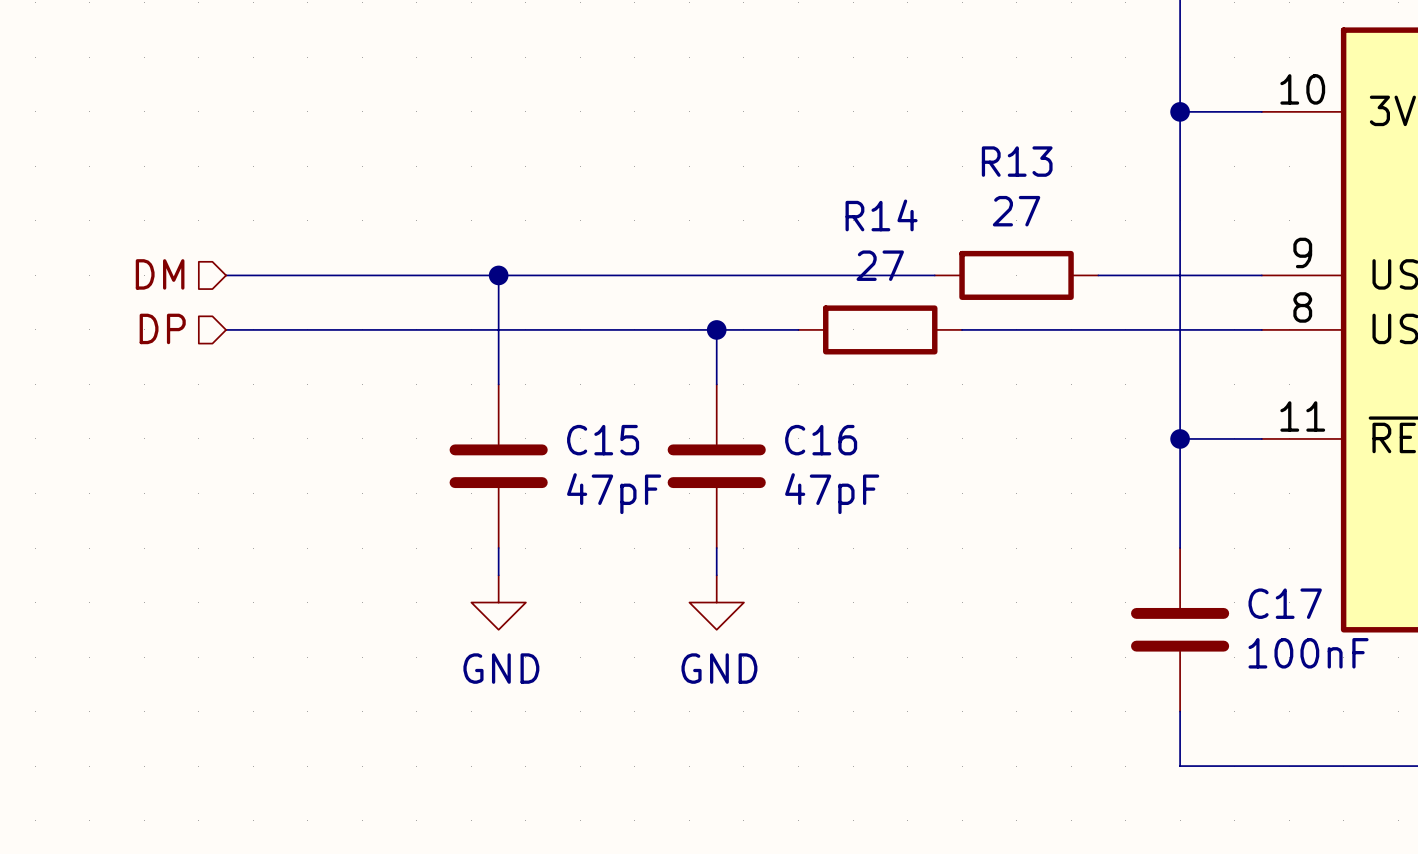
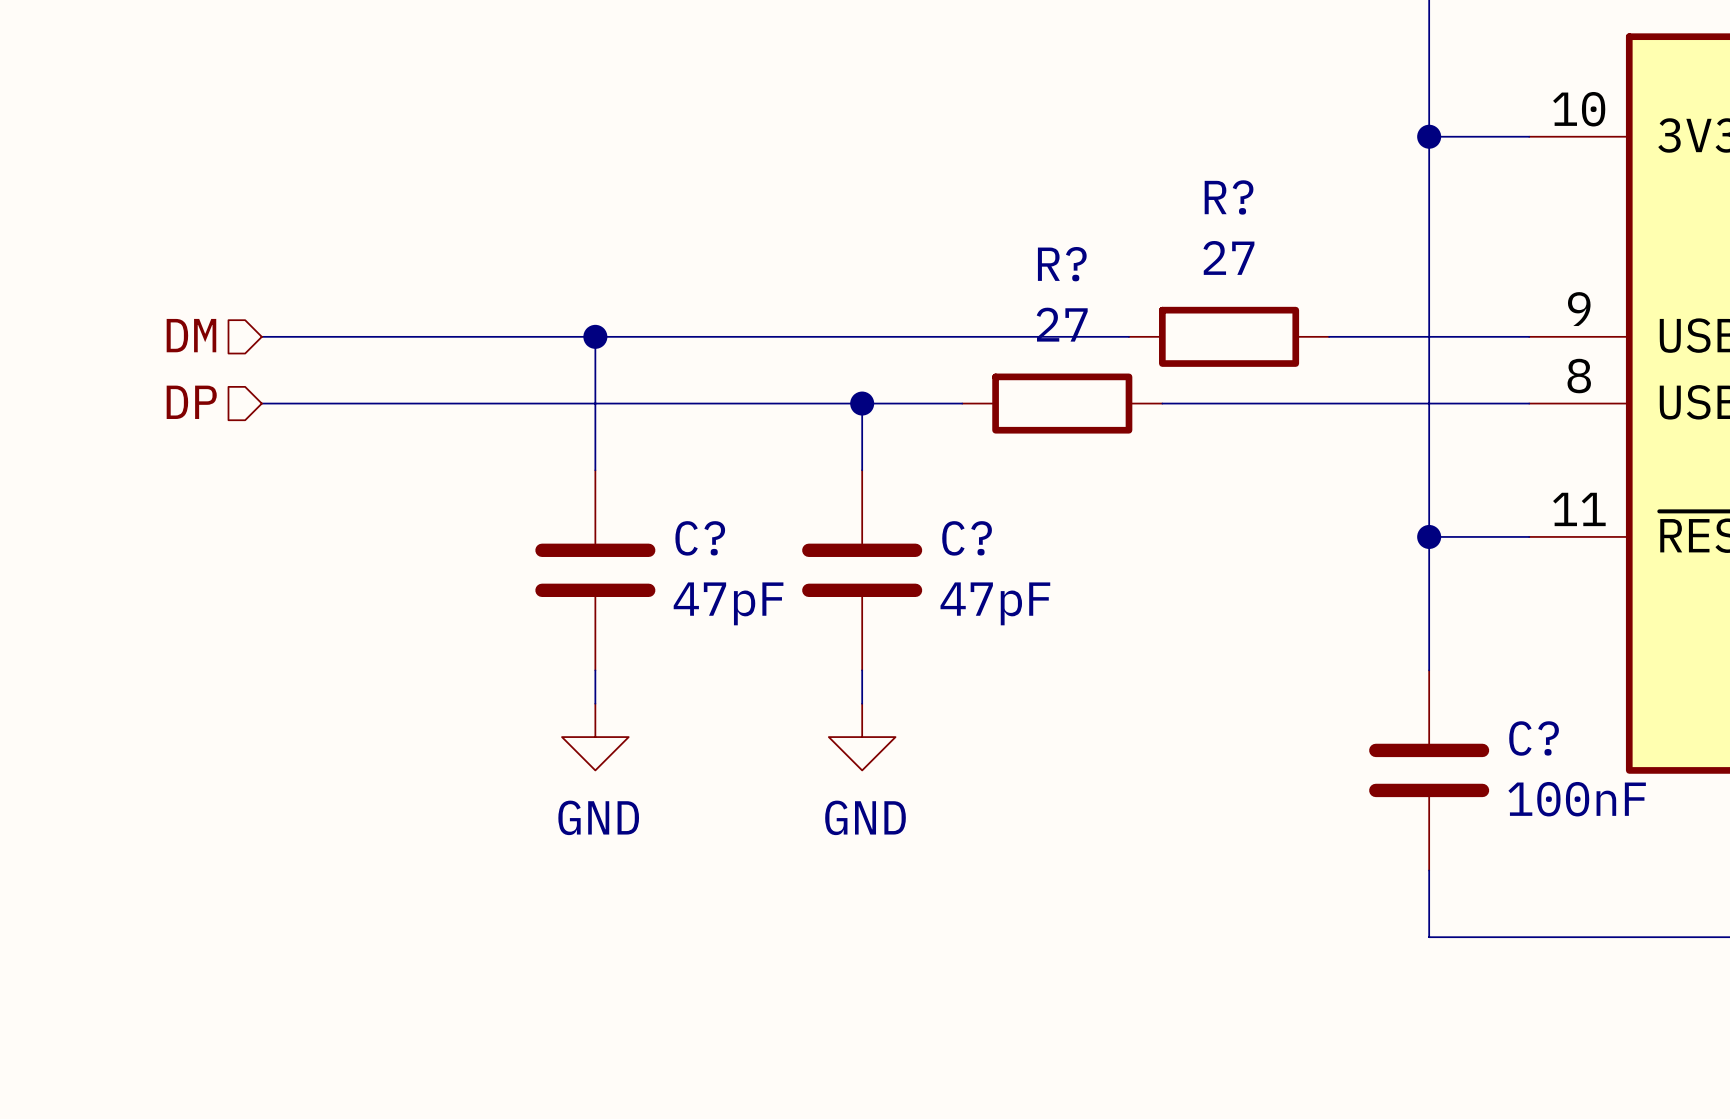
R13 name: R13 (1017, 161) -> R? (1229, 197)
R14 name: R14 (881, 215) -> R? (1062, 264)
C15 name: C15 (603, 440) -> C? (700, 538)
C16 name: C16 (821, 440) -> C? (967, 538)
C17 name: C17 (1285, 603) -> C? (1534, 738)

